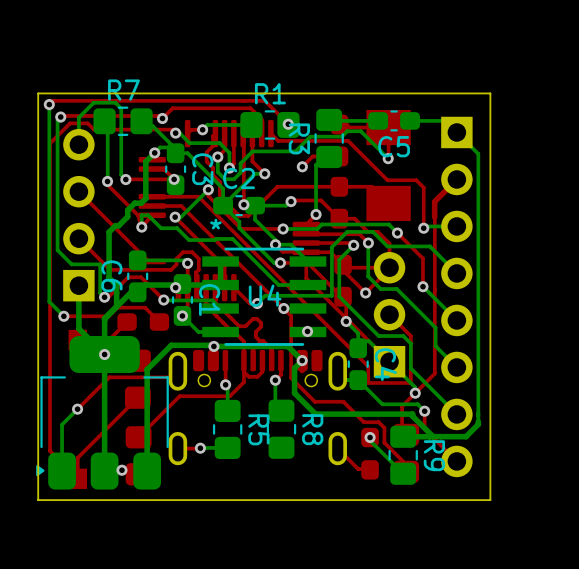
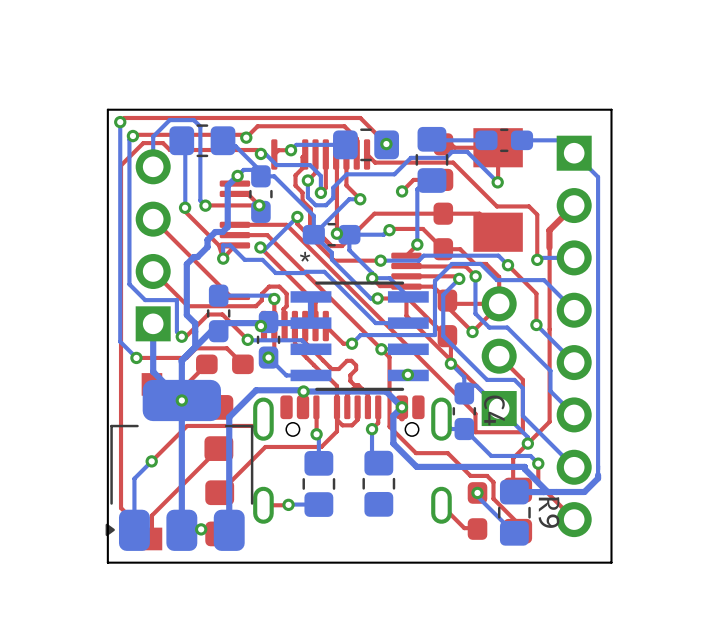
R7 name: R7 (123, 90) -> none
R1 name: R1 (270, 93) -> none
R3 name: R3 (299, 138) -> none
C5 name: C5 (394, 146) -> none
C3 name: C3 (202, 169) -> none
C2 name: C2 (239, 178) -> none
C6 name: C6 (111, 276) -> none
U4 name: U4 (265, 295) -> none
C1 name: C1 (209, 300) -> none
R5 name: R5 (258, 429) -> none
R8 name: R8 (312, 429) -> none

